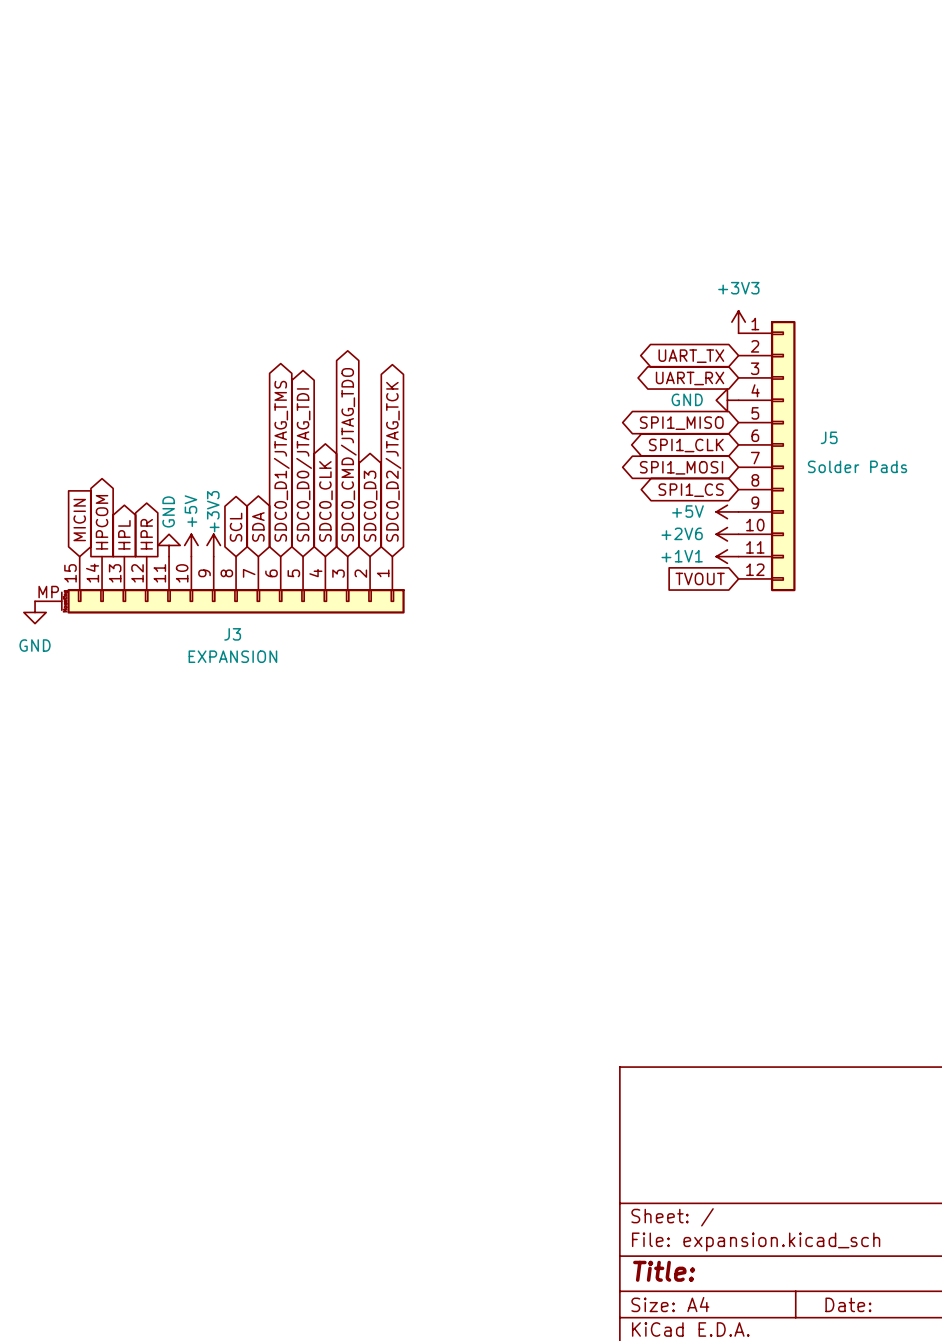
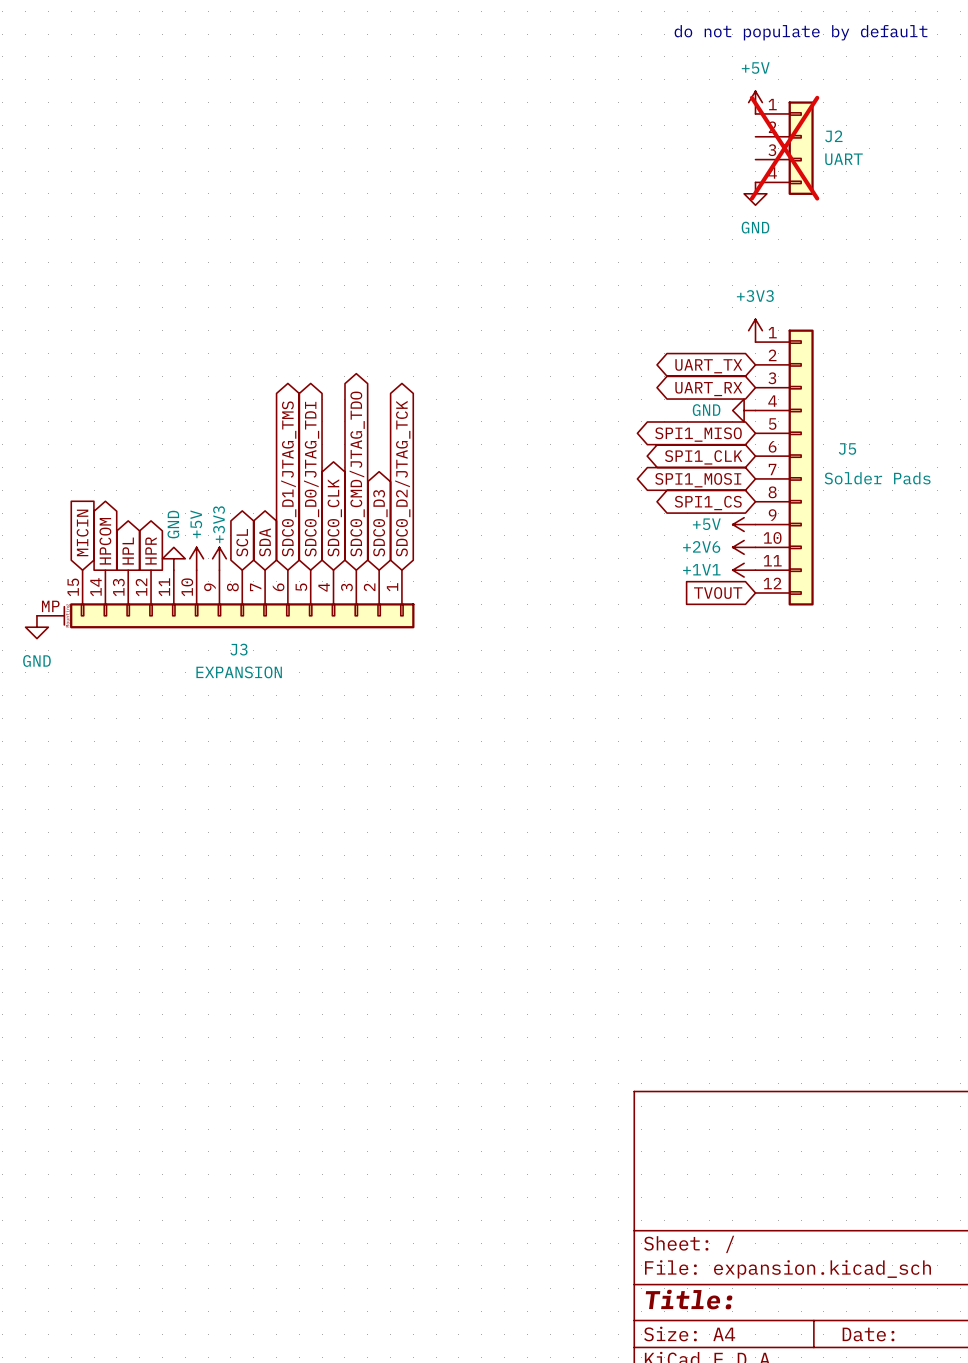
text: none -> do not populate by default (801, 32)
power symbol: none -> +5V (755, 102)
J2: none -> UART (784, 148)
power symbol: none -> GND (755, 193)

